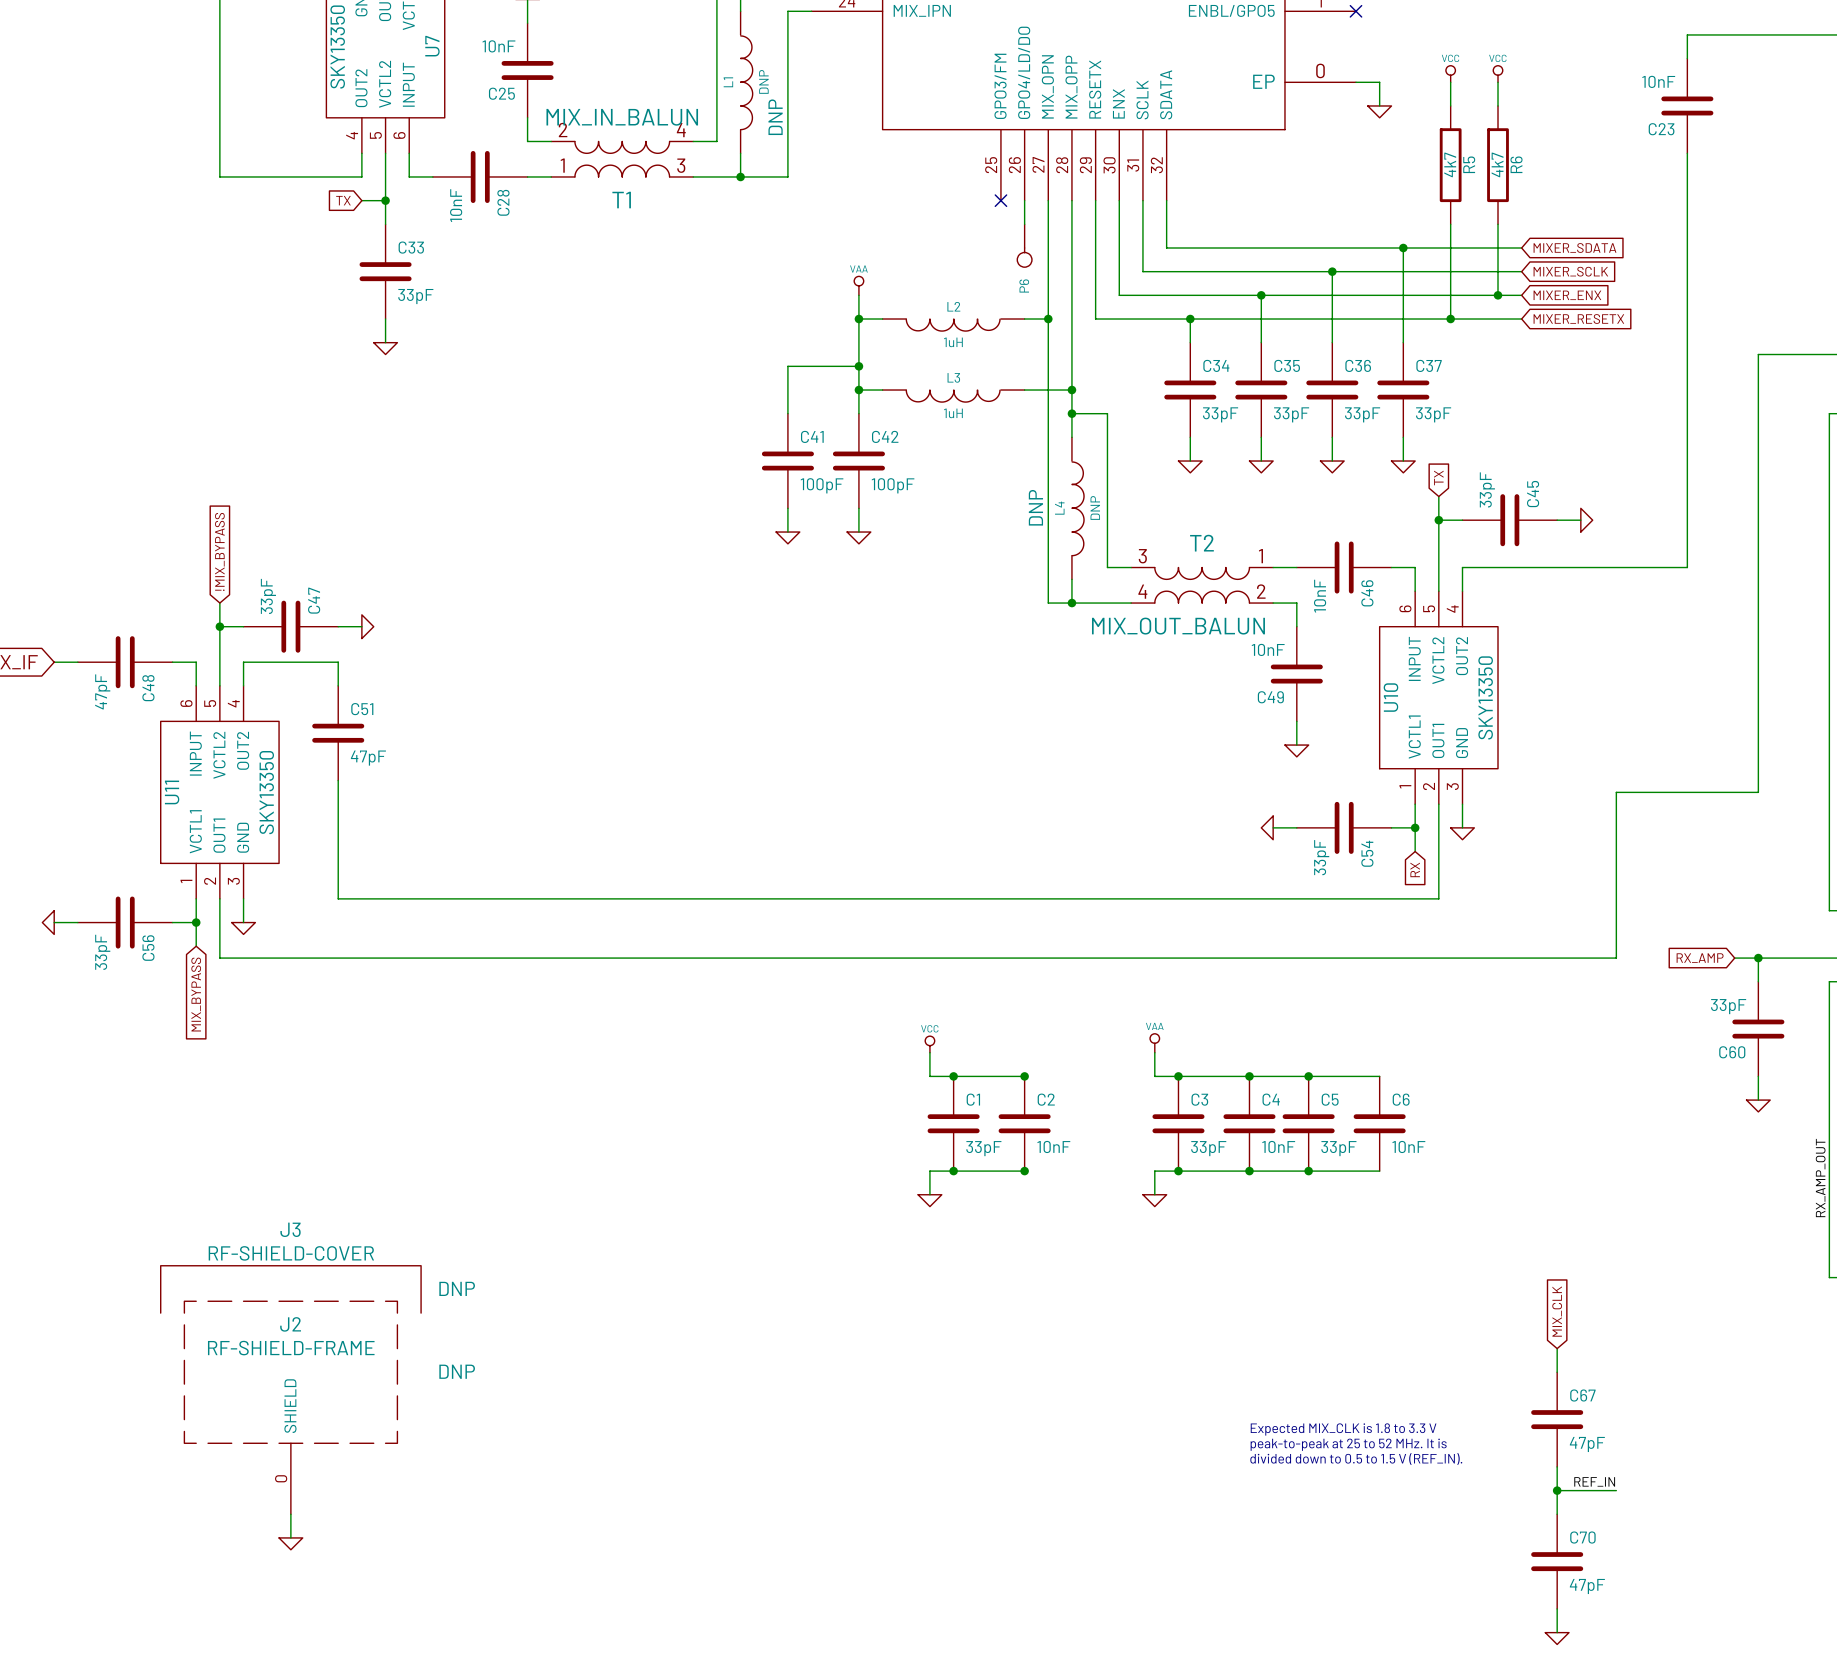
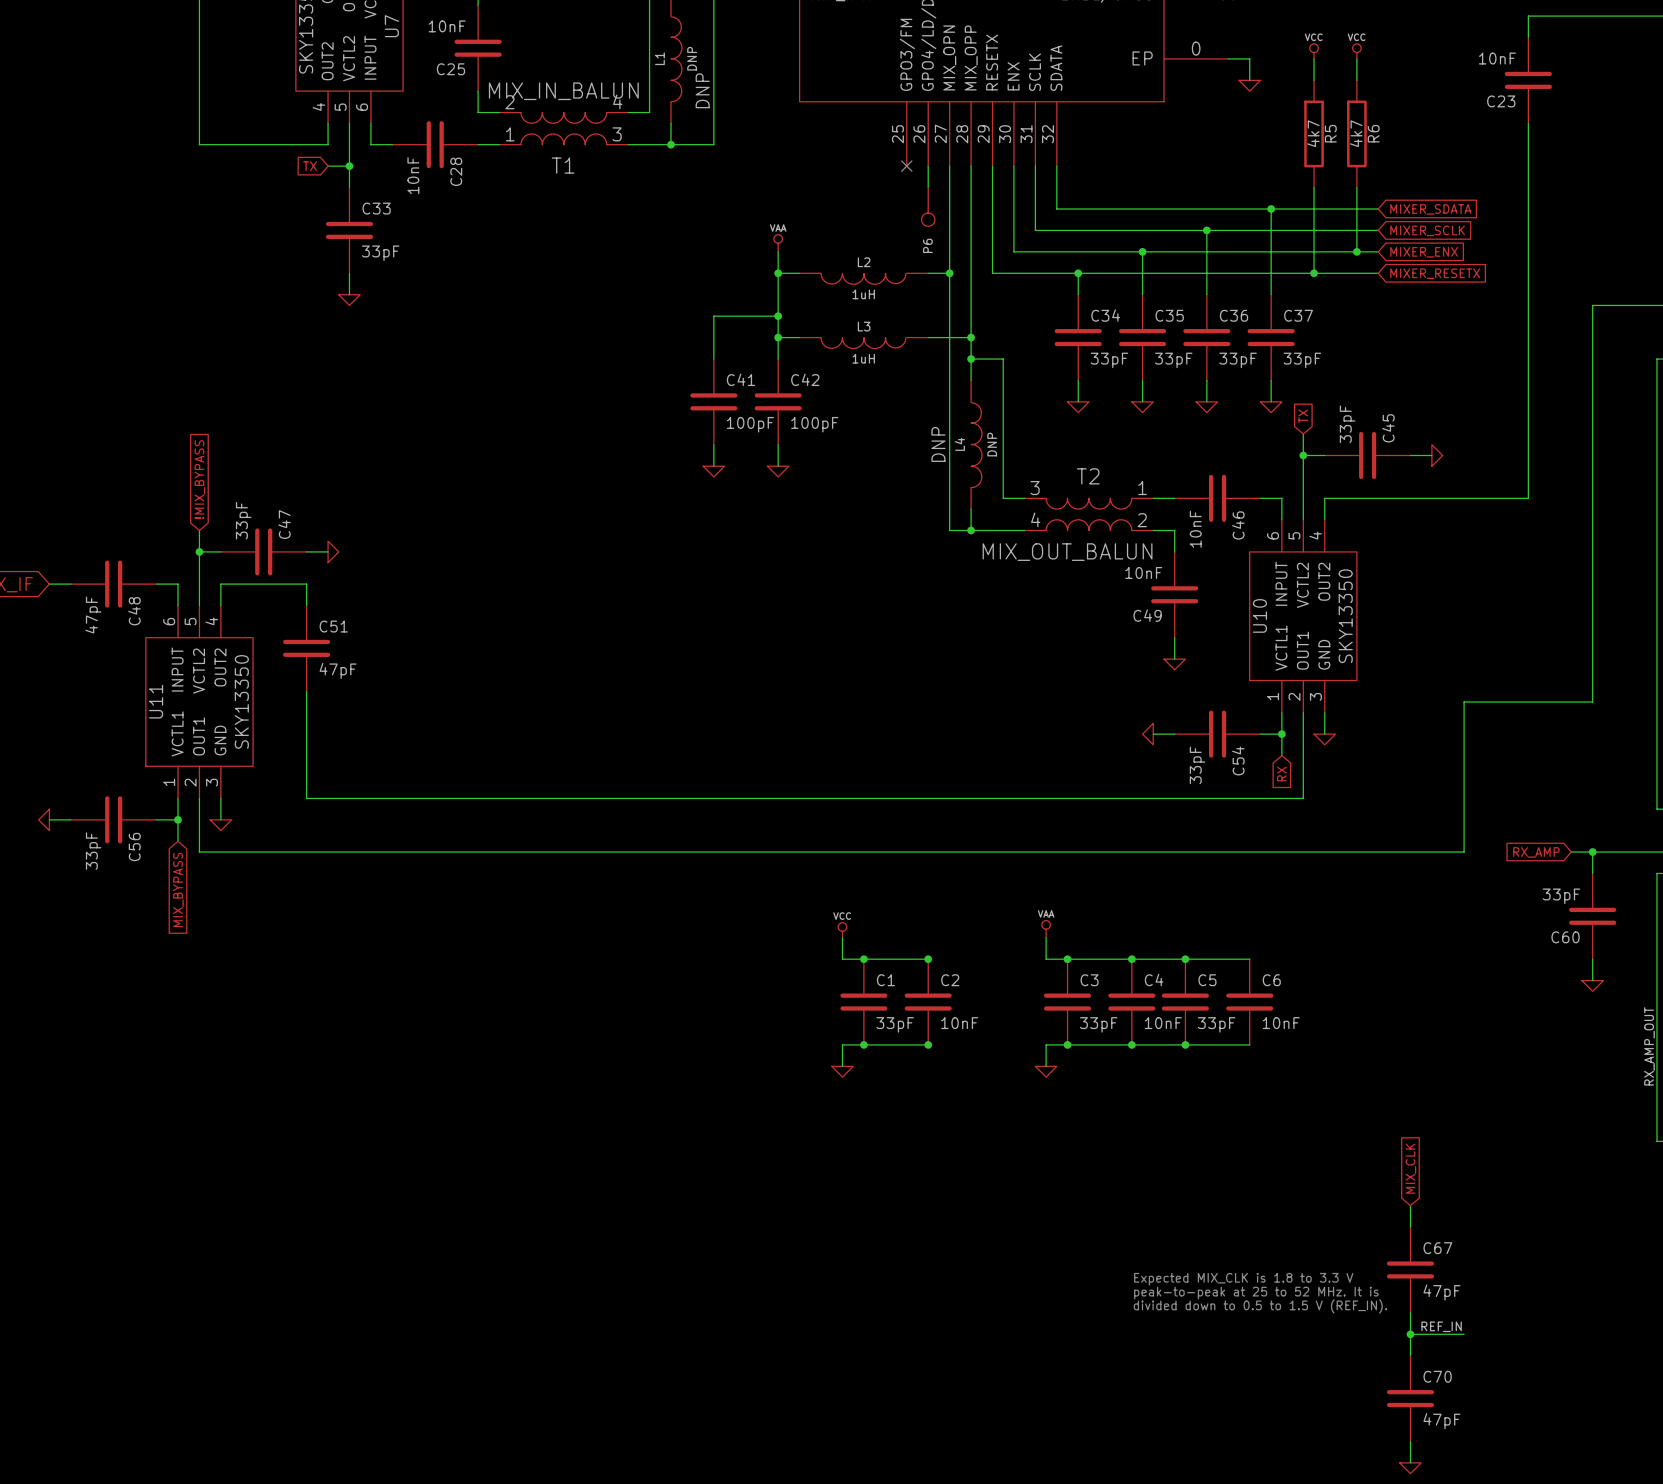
J3: RF-SHIELD-COVER (290, 1289) -> none
J2: RF-SHIELD-FRAME (290, 1407) -> none
wire: (290, 1514) (290, 1537) -> none
power symbol: (290, 1543) -> none

